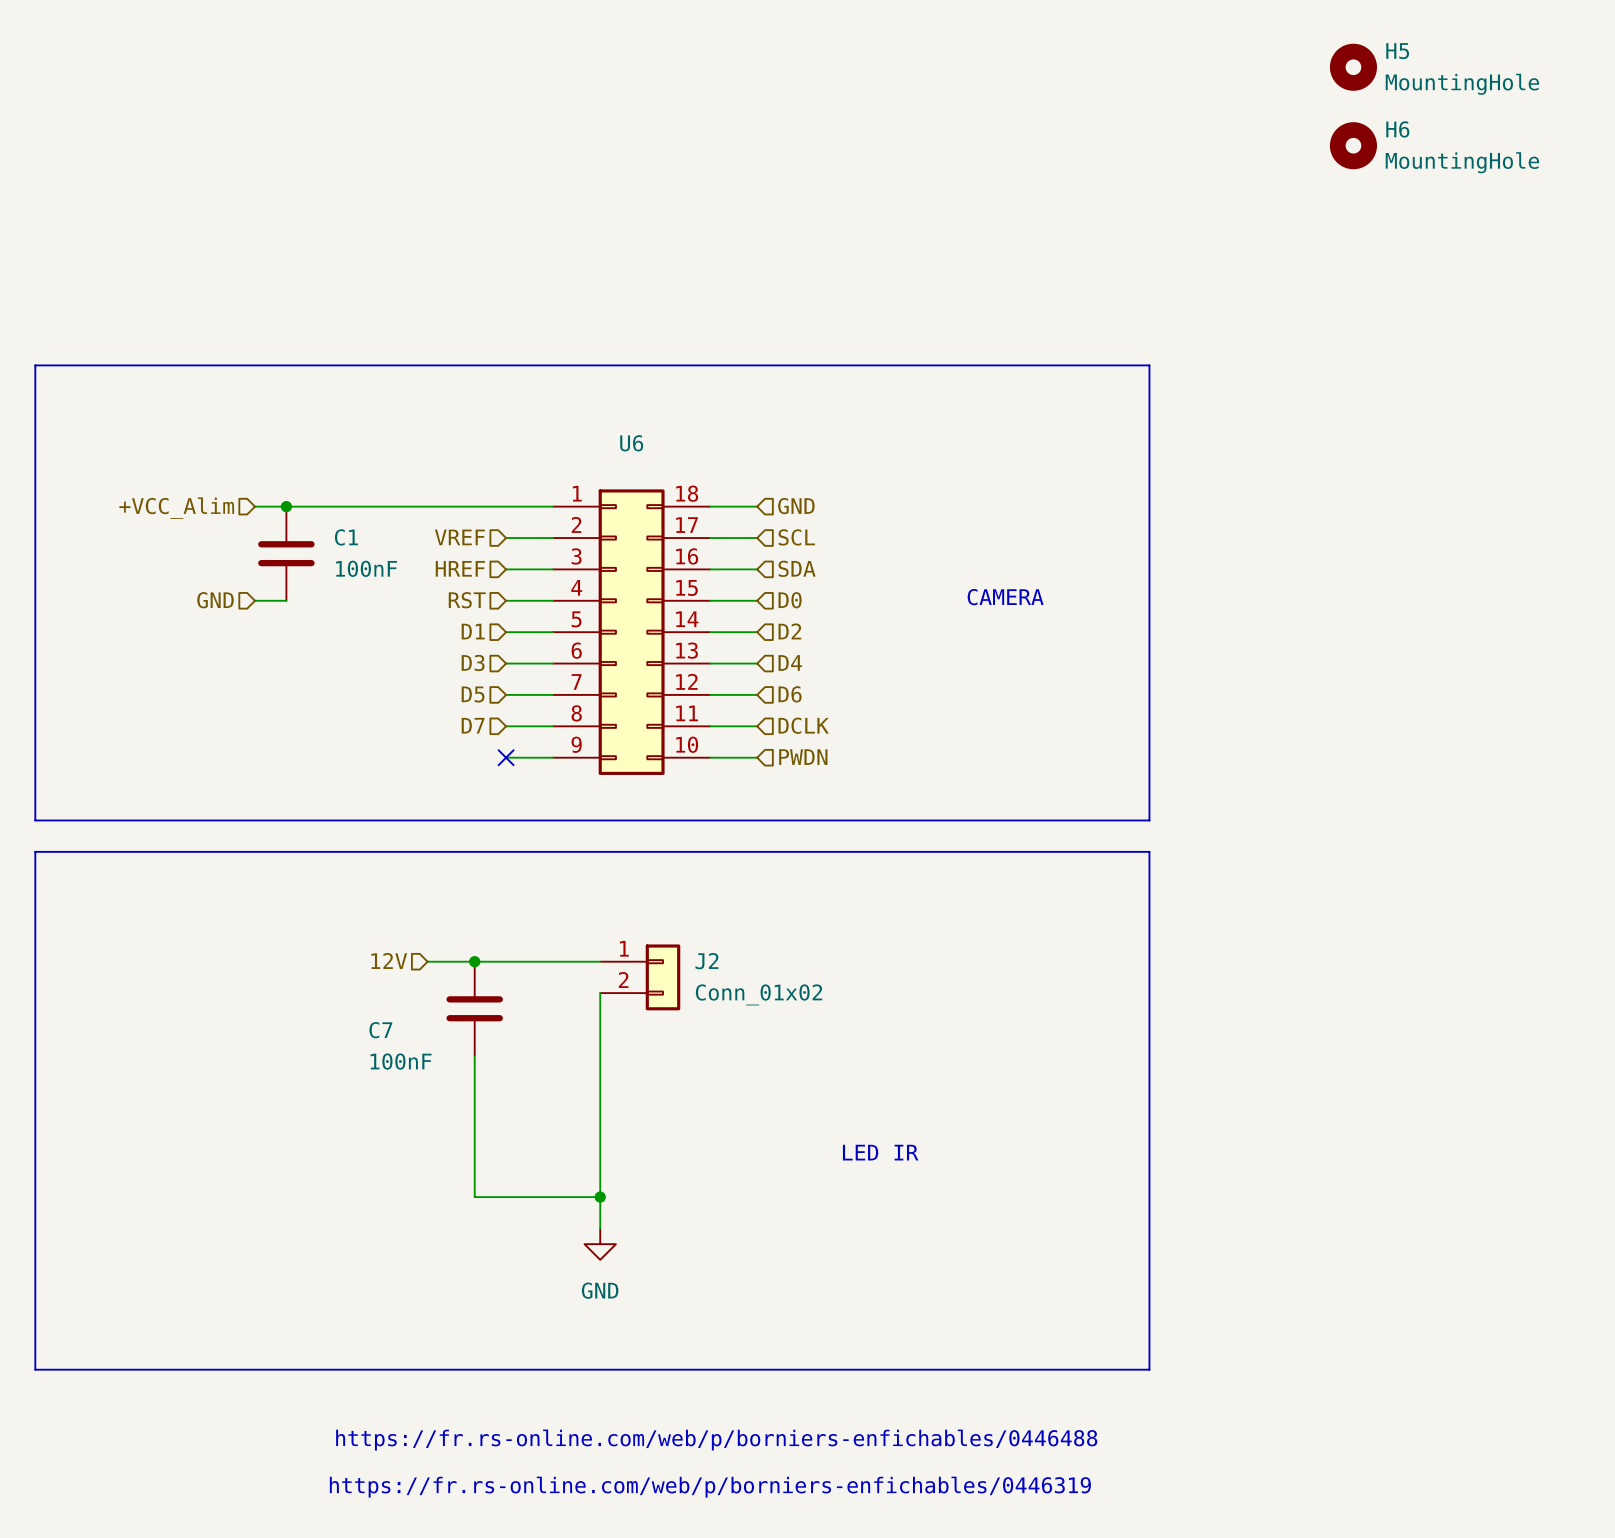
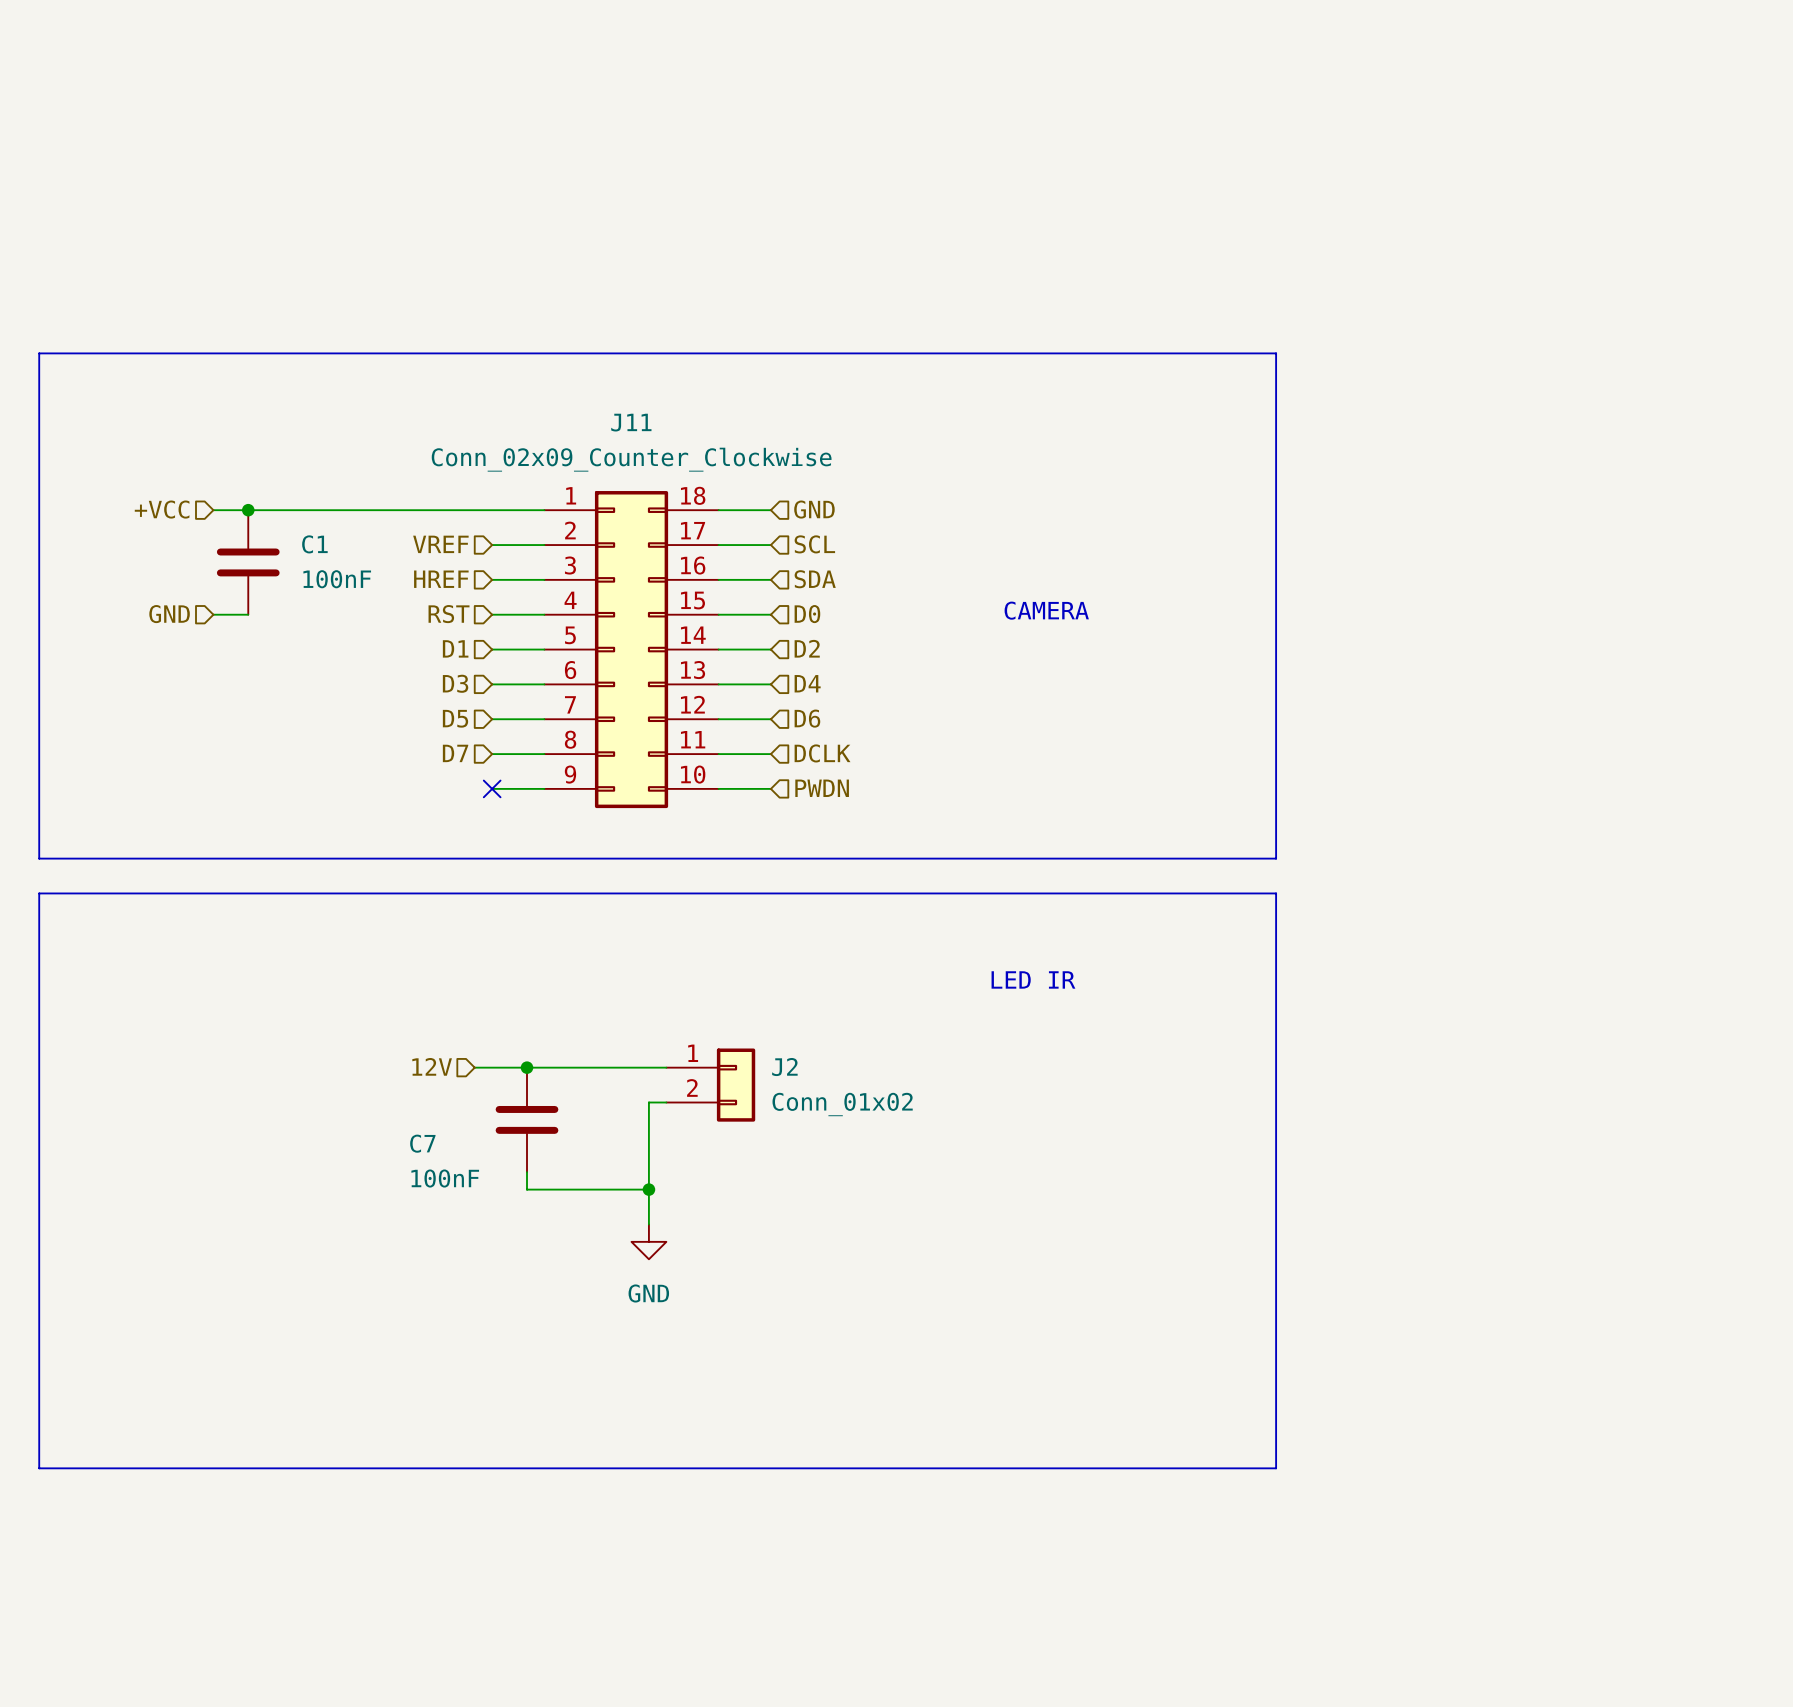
H5: MountingHole (1353, 67) -> none
H6: MountingHole (1353, 145) -> none
line: (35, 365) (1149, 365) -> (39, 405) (39, 353) (1276, 353) (1276, 405)
hierarchical label: none -> +VCC (162, 509)
junction: none -> (248, 510)
wire: (255, 506) (553, 506) -> (213, 510) (544, 510)
junction: (286, 506) -> none
wire: (710, 506) (757, 506) -> (718, 510) (770, 510)
hierarchical label position: GND (796, 506) -> GND (814, 509)
hierarchical label: +VCC_Alim (176, 508) -> none
hierarchical label position: VREF (459, 537) -> VREF (440, 544)
hierarchical label position: SCL (796, 537) -> SCL (814, 544)
wire: (506, 538) (553, 538) -> (492, 545) (544, 545)
wire: (710, 538) (757, 538) -> (718, 545) (770, 545)
C1 position: (286, 553) -> (248, 562)
hierarchical label position: HREF (460, 568) -> HREF (441, 579)
hierarchical label position: SDA (797, 568) -> SDA (815, 579)
wire: (506, 569) (553, 569) -> (492, 579) (544, 579)
wire: (710, 569) (757, 569) -> (718, 579) (770, 579)
J11: none -> Conn_02x09_Counter_Clockwise (631, 649)
text position: CAMERA (1005, 597) -> CAMERA (1046, 610)
hierarchical label position: GND (215, 600) -> GND (169, 614)
wire: (255, 600) (286, 600) -> (213, 614) (248, 614)
hierarchical label position: RST (467, 600) -> RST (449, 614)
wire: (506, 600) (553, 600) -> (492, 614) (544, 614)
wire: (710, 600) (757, 600) -> (718, 614) (770, 614)
hierarchical label position: D0 (790, 600) -> D0 (807, 614)
hierarchical label position: D1 (473, 631) -> D1 (455, 648)
hierarchical label position: D2 (789, 631) -> D2 (807, 648)
wire: (506, 632) (553, 632) -> (492, 649) (544, 649)
U6: (631, 632) -> none
wire: (710, 632) (757, 632) -> (718, 649) (770, 649)
hierarchical label position: D3 (473, 662) -> D3 (455, 683)
hierarchical label position: D4 (790, 662) -> D4 (807, 683)
wire: (506, 663) (553, 663) -> (492, 684) (544, 684)
wire: (710, 663) (757, 663) -> (718, 684) (770, 684)
hierarchical label position: D5 (473, 694) -> D5 (455, 718)
wire: (506, 694) (553, 694) -> (492, 719) (544, 719)
wire: (710, 694) (757, 694) -> (718, 719) (770, 719)
hierarchical label position: D6 (790, 694) -> D6 (807, 718)
no-connect mark: none -> (492, 788)
hierarchical label position: D7 (473, 725) -> D7 (455, 753)
hierarchical label position: DCLK (803, 725) -> DCLK (822, 753)
wire: (506, 726) (553, 726) -> (492, 754) (544, 754)
wire: (710, 726) (757, 726) -> (718, 754) (770, 754)
wire: (506, 757) (553, 757) -> (492, 788) (544, 788)
no-connect mark: (506, 757) -> none
wire: (710, 757) (757, 757) -> (718, 788) (770, 788)
hierarchical label position: PWDN (803, 757) -> PWDN (822, 788)
line: (35, 773) (35, 804) -> (39, 858) (1276, 858)
line: (1149, 773) (1149, 804) -> (39, 893) (1276, 893)
line: (35, 820) (1149, 820) -> (39, 910) (39, 945)
line: (35, 851) (1149, 851) -> (1276, 910) (1276, 945)
wire: (600, 993) (600, 1228) -> (666, 1102) (648, 1102) (648, 1224)
wire: (474, 1071) (474, 1197) (600, 1197) -> (527, 1189) (648, 1189)
junction: none -> (648, 1189)
text position: LED IR (880, 1152) -> LED IR (1033, 979)
junction: (600, 1197) -> none
power symbol position: GND (600, 1244) -> GND (648, 1241)
line: (35, 1322) (35, 1369) (1149, 1369) (1149, 1322) -> (39, 1468) (1276, 1468)
text: https://fr.rs-online.com/web/p/borniers-enfichables/0446488 (716, 1440) -> none
text: https://fr.rs-online.com/web/p/borniers-enfichables/0446319 (710, 1487) -> none

